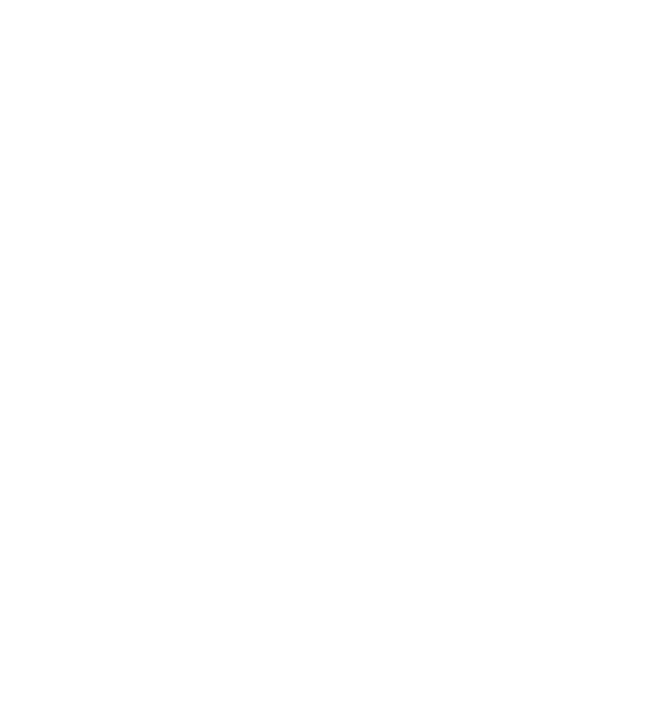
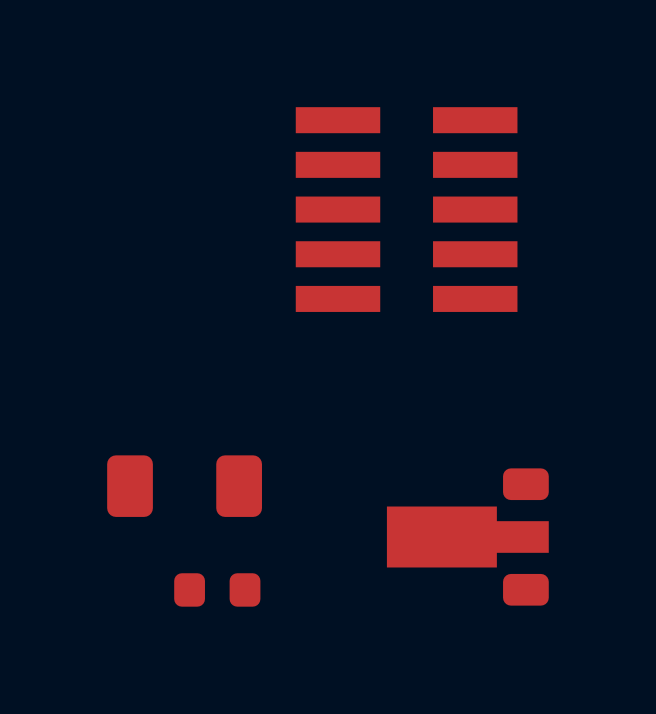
part: none -> (406, 209)
part: none -> (184, 486)
part: none -> (467, 537)
part: none -> (217, 589)

